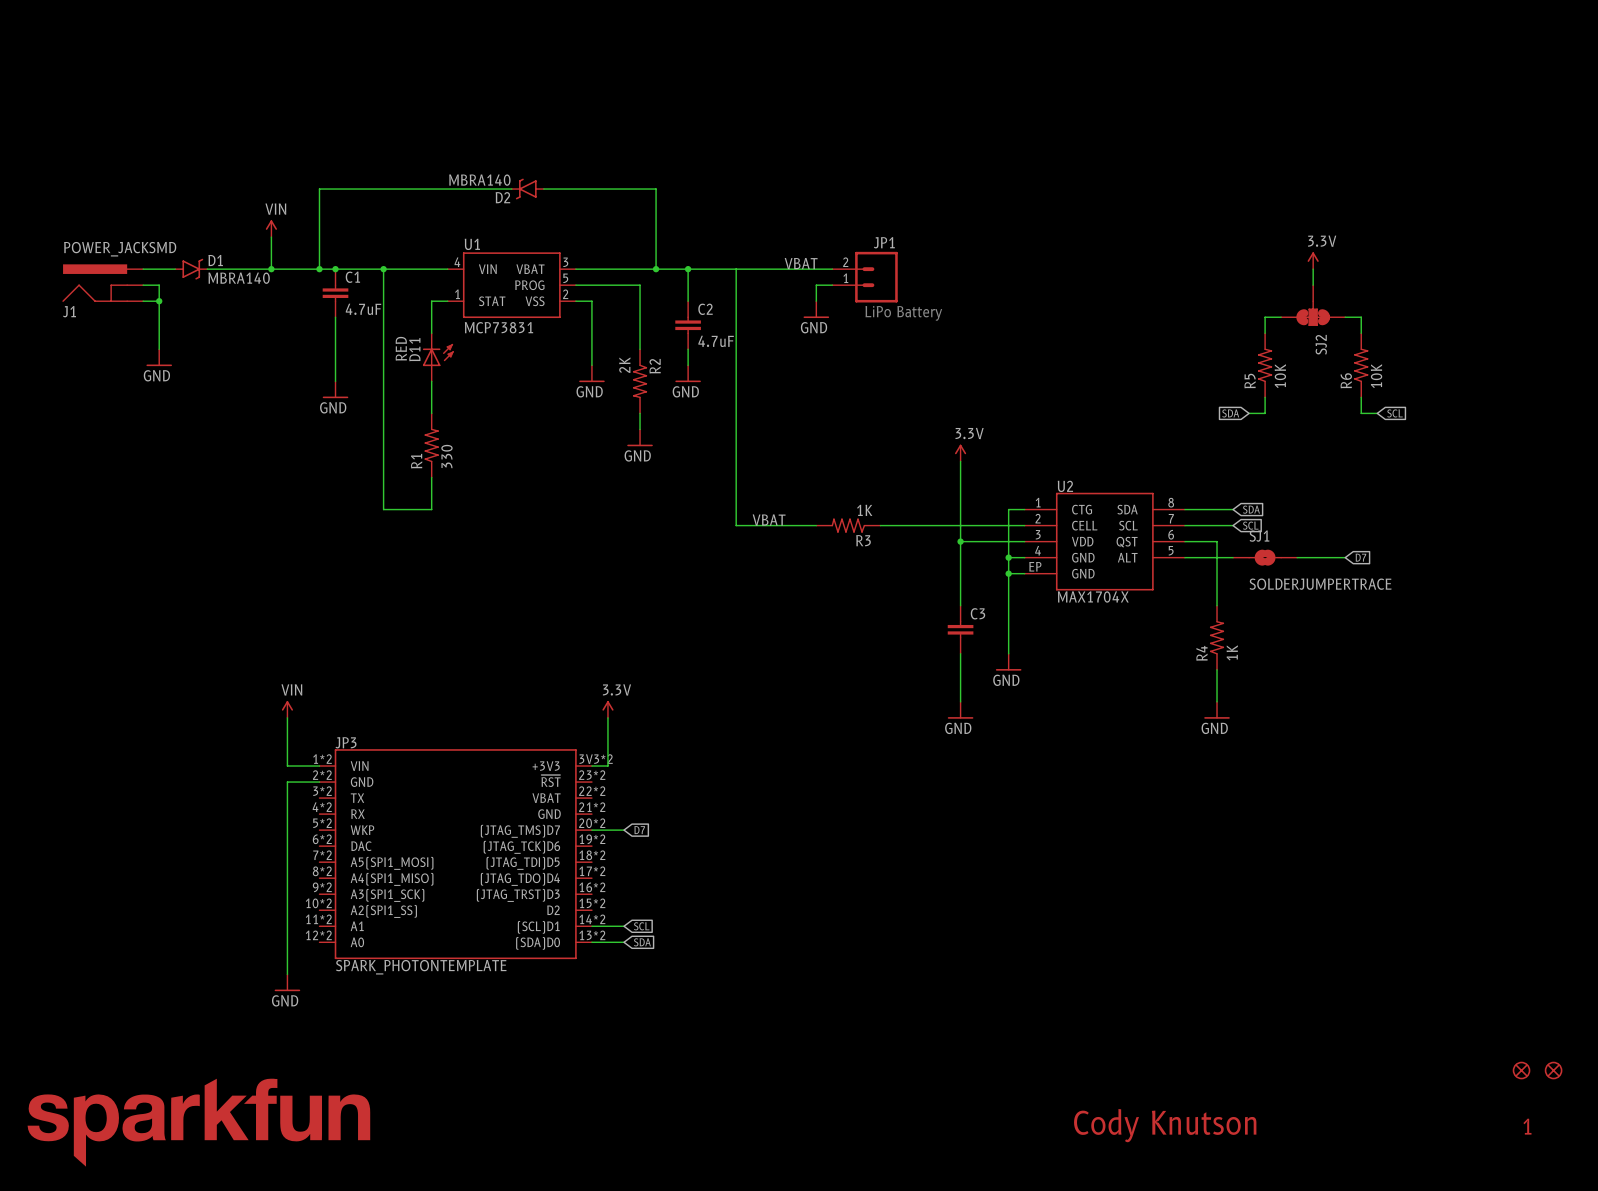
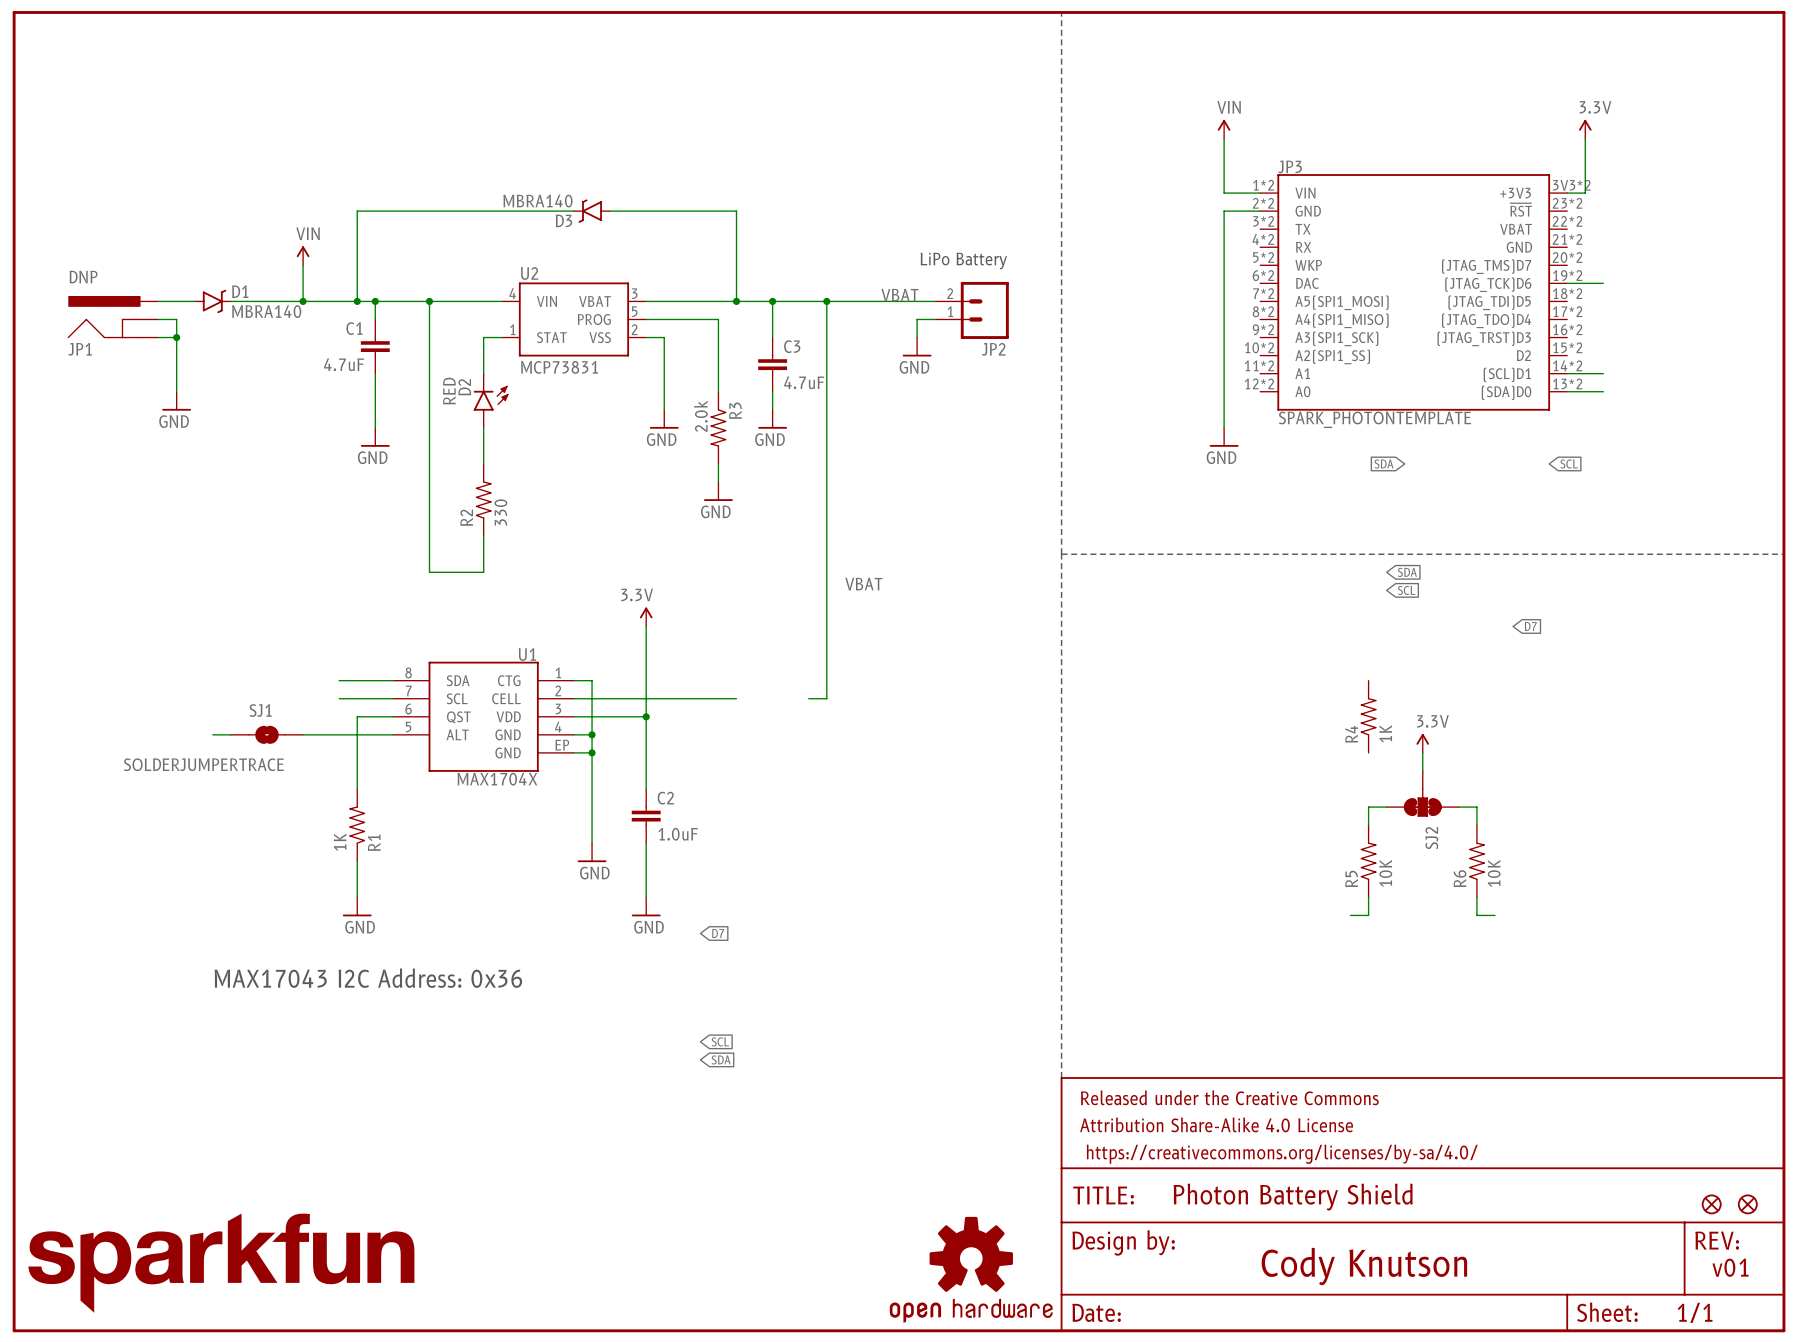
line: none -> (1061, 12) (1061, 1077)
power symbol: none -> VIN (1224, 129)
power symbol: none -> 3.3V (1585, 129)
wire: none -> (1224, 138) (1224, 193) (1260, 193)
wire: none -> (1585, 138) (1585, 193) (1567, 193)
wire: none -> (1260, 211) (1224, 211) (1224, 427)
D2 name: D2 (502, 197) -> D3 (563, 220)
JP1 name: JP1 (884, 242) -> JP2 (993, 349)
U1 name: U1 (472, 244) -> U2 (529, 273)
J1 value: POWER_JACKSMD (120, 249) -> DNP (83, 277)
wire: none -> (1567, 283) (1603, 283)
power symbol: 3.3V (1313, 260) -> none
junction: none -> (826, 301)
wire: (1313, 269) (1313, 285) -> none
C1 name position: C1 (352, 277) -> C1 (354, 328)
C1 position: (335, 293) -> (375, 346)
SJ2 position: (1313, 305) -> (1422, 793)
C1 value position: 4.7uF (363, 309) -> 4.7uF (344, 364)
C2 name: C2 (705, 309) -> C3 (792, 346)
J1 name: J1 (69, 311) -> JP1 (80, 349)
text position: LiPo Battery (903, 313) -> LiPo Battery (963, 260)
wire: (1281, 317) (1265, 317) (1265, 333) -> none
wire: (1345, 317) (1361, 317) (1361, 333) -> none
wire: none -> (1567, 373) (1603, 373)
wire: none -> (1567, 391) (1603, 391)
D11: RED (438, 357) -> none
D2: none -> RED (491, 400)
R2 value: 2K (624, 365) -> 2.0k (700, 416)
R5 position: (1265, 365) -> (1368, 861)
R6 position: (1361, 365) -> (1476, 861)
R2 name: R2 (655, 366) -> R3 (735, 410)
power symbol: none -> GND (1224, 437)
wire: (1265, 397) (1265, 413) (1249, 413) -> none
wire: (1361, 397) (1361, 413) (1377, 413) -> none
power symbol: 3.3V (960, 453) -> none
R1 name: R1 (416, 461) -> R2 (466, 517)
wire: (960, 461) (960, 605) -> none
line: none -> (1061, 554) (1783, 554)
wire: (1024, 509) (1008, 509) (1008, 653) -> none
wire: (1184, 509) (1233, 509) -> none
wire: (736, 525) (816, 525) -> (826, 590) (826, 698) (808, 698)
R3: 1K (848, 525) -> none
wire: (880, 525) (1024, 525) -> none
wire: (1184, 525) (1233, 525) -> none
wire: (960, 541) (1024, 541) -> none
junction: (960, 541) -> none
U2: MAX1704X (1104, 541) -> none
wire: (1184, 541) (1217, 541) (1217, 605) -> none
power symbol: none -> 3.3V (646, 617)
wire: none -> (646, 626) (646, 789)
wire: (1008, 557) (1024, 557) -> none
junction: (1008, 557) -> none
wire: (1184, 557) (1233, 557) -> none
SJ1 position: (1265, 557) -> (266, 734)
wire: (1297, 557) (1345, 557) -> none
wire: (1008, 573) (1024, 573) -> none
junction: (1008, 573) -> none
SJ1 value position: SOLDERJUMPERTRACE (1320, 584) -> SOLDERJUMPERTRACE (203, 764)
part: none -> (899, 671)
wire: none -> (339, 680) (393, 680)
wire: none -> (573, 680) (592, 680) (592, 843)
wire: none -> (339, 698) (393, 698)
wire: none -> (573, 698) (736, 698)
C3: (960, 629) -> none
wire: none -> (393, 716) (357, 716) (357, 789)
U1: none -> MAX1704X (483, 716)
wire: none -> (573, 716) (646, 716)
junction: none -> (646, 716)
wire: none -> (212, 734) (230, 734)
wire: none -> (303, 734) (393, 734)
wire: none -> (573, 734) (592, 734)
junction: none -> (592, 734)
wire: (960, 653) (960, 701) -> none
power symbol: none -> 3.3V (1422, 743)
power symbol: GND (1008, 662) -> none
wire: none -> (573, 752) (592, 752)
junction: none -> (592, 752)
wire: (1217, 669) (1217, 701) -> none
wire: none -> (1422, 752) (1422, 770)
power symbol: VIN (287, 709) -> none
power symbol: 3.3V (607, 709) -> none
power symbol: GND (960, 710) -> none
power symbol: GND (1217, 710) -> none
wire: (287, 717) (287, 766) (319, 766) -> (357, 897) (357, 861)
wire: (607, 717) (607, 766) (591, 766) -> none
wire: none -> (1458, 807) (1476, 807) (1476, 825)
C2: none -> 1.0uF (646, 816)
R1: none -> 1K (357, 825)
power symbol: none -> GND (592, 852)
wire: (319, 782) (287, 782) (287, 974) -> none
wire: none -> (1368, 897) (1368, 915) (1350, 915)
wire: none -> (1476, 897) (1476, 915) (1494, 915)
power symbol: none -> GND (357, 906)
power symbol: none -> GND (646, 906)
wire: (591, 830) (624, 830) -> none
JP3 position: (455, 854) -> (1413, 292)
text: none -> MAX17043 I2C Address: 0x36 (368, 978)
wire: (591, 926) (624, 926) -> none
wire: (591, 942) (624, 942) -> none
power symbol: GND (287, 982) -> none
part: none -> (1422, 1204)
text position: Cody Knutson (1165, 1125) -> Cody Knutson (1364, 1266)
text: 1 (1527, 1126) -> v01 (1730, 1267)
part: none -> (971, 1269)

